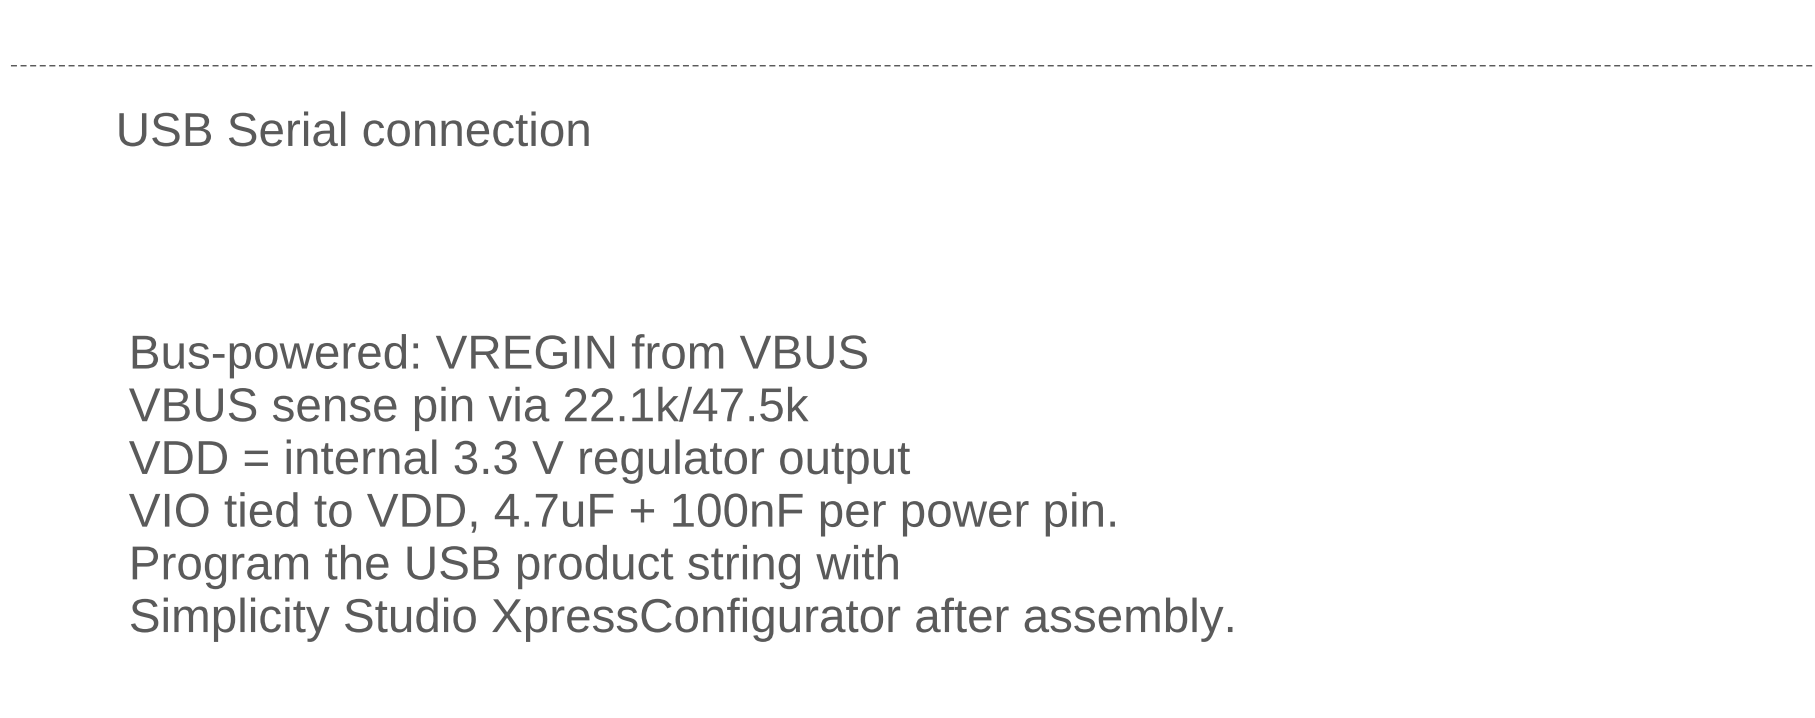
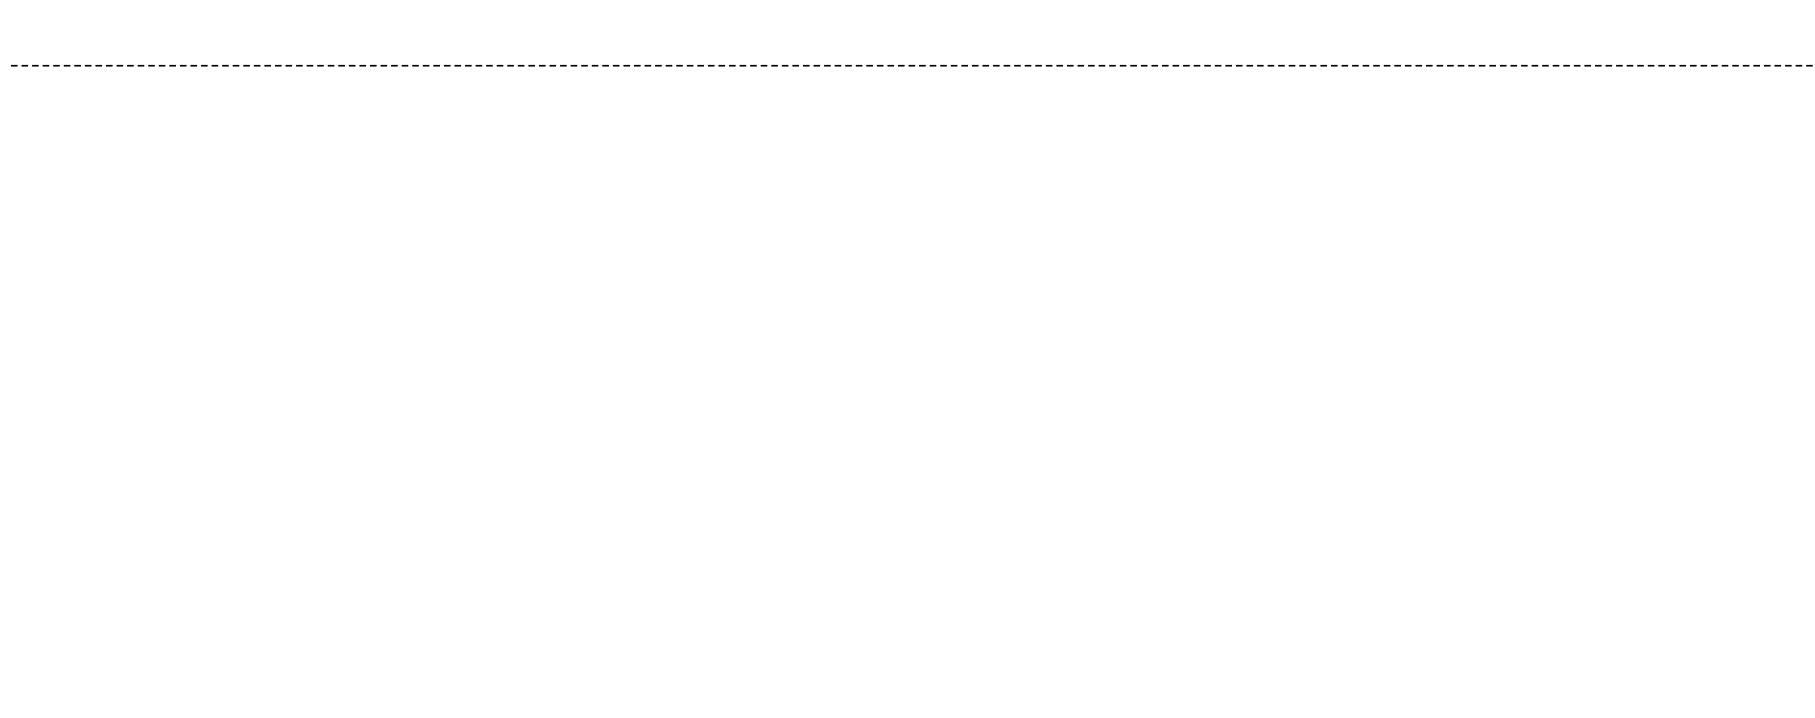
text: USB Serial connection (354, 128) -> none
text: Bus-powered: VREGIN from VBUS (499, 356) -> none
text: VBUS sense pin via 22.1k/47.5k (468, 408) -> none
text: VDD = internal 3.3 V regulator output (519, 461) -> none
text: VIO tied to VDD, 4.7uF + 100nF per power pin. (621, 514) -> none
text: Program the USB product string with (515, 567) -> none
text: Simplicity Studio XpressConfigurator after assembly. (681, 619) -> none

